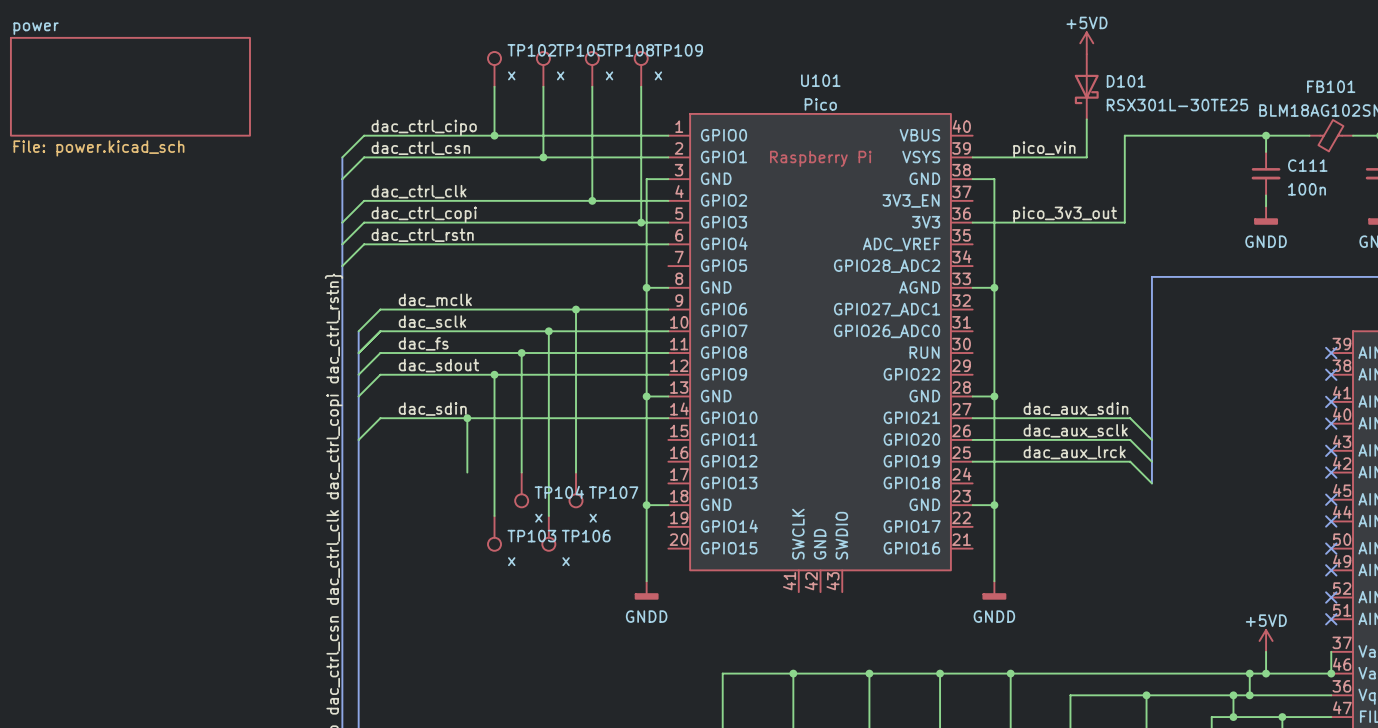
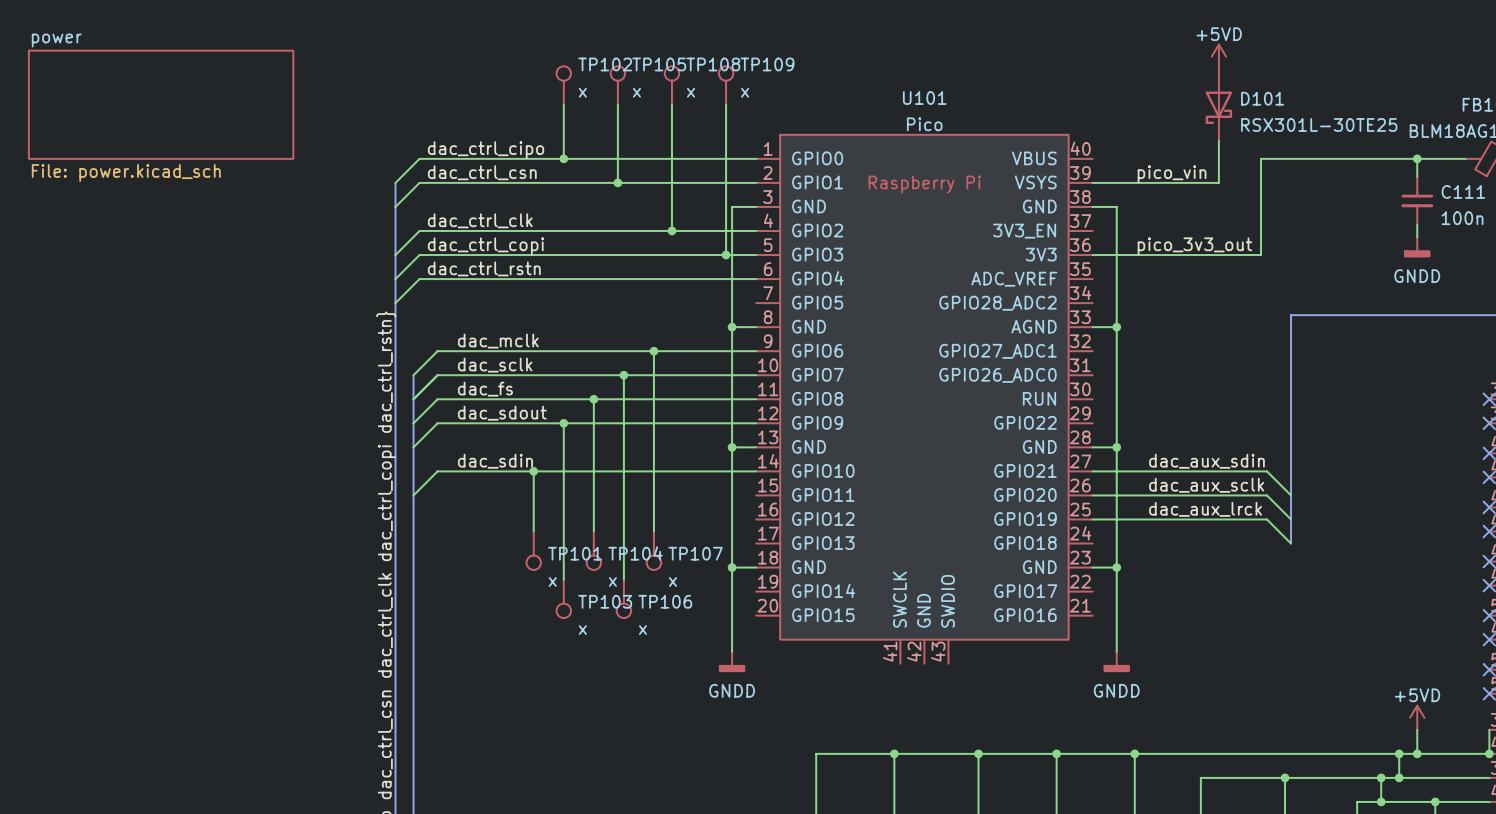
TP101: none -> x (533, 550)

